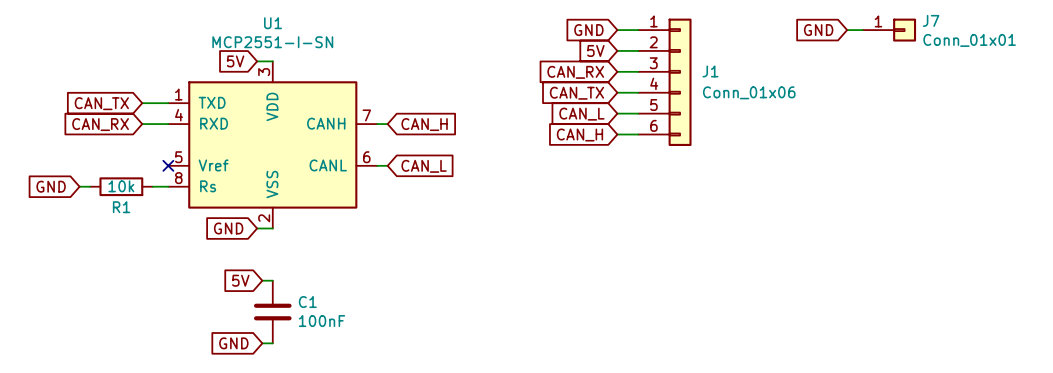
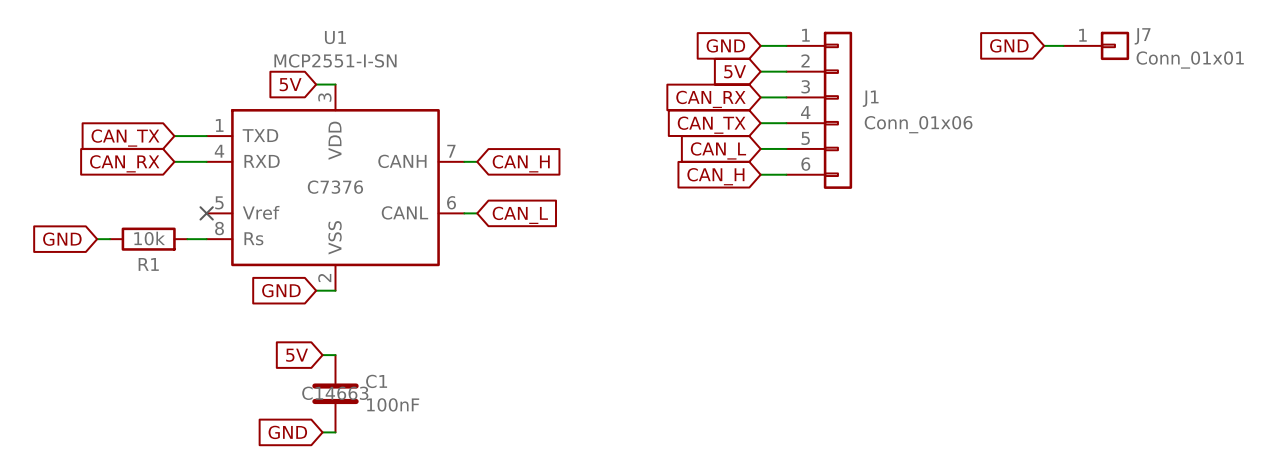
U1 text: none -> C7376 (335, 187)
C1 text: none -> C14663 (335, 393)

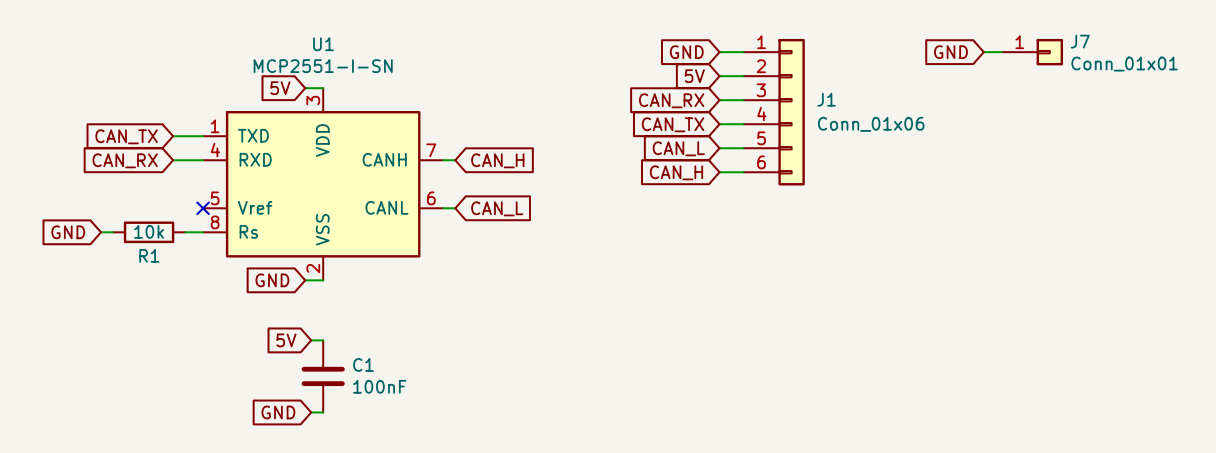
U1 text: C7376 (335, 187) -> none
C1 text: C14663 (335, 393) -> none

